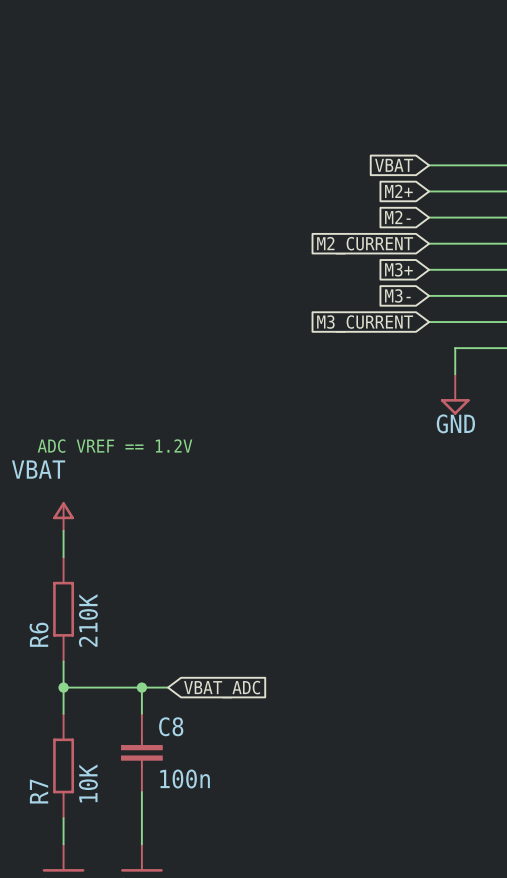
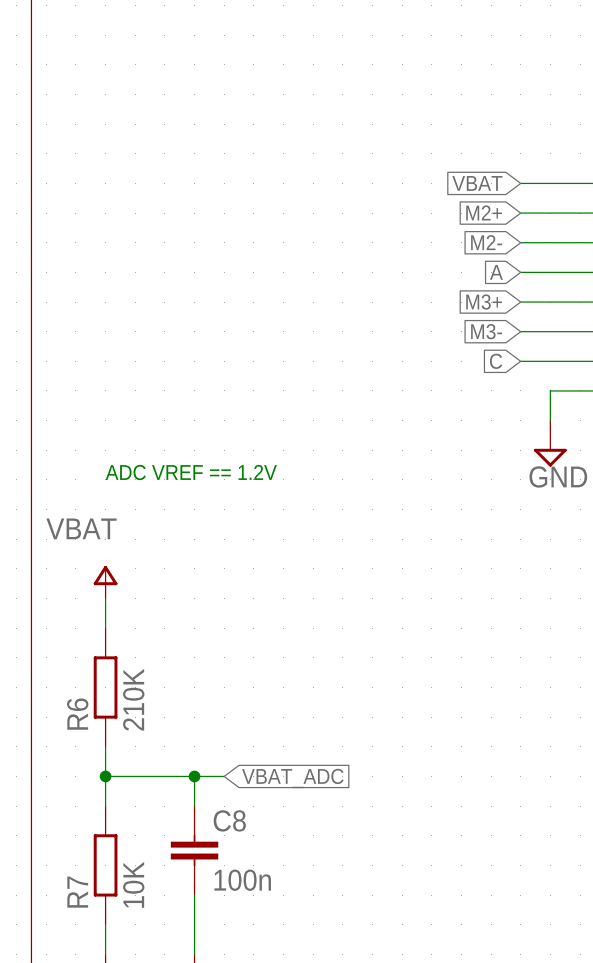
global label: M2_CURRENT (365, 245) -> A (496, 272)
global label: M3_CURRENT (365, 324) -> C (496, 361)
text position: ADC VREF == 1.2V (115, 446) -> ADC VREF == 1.2V (191, 472)

